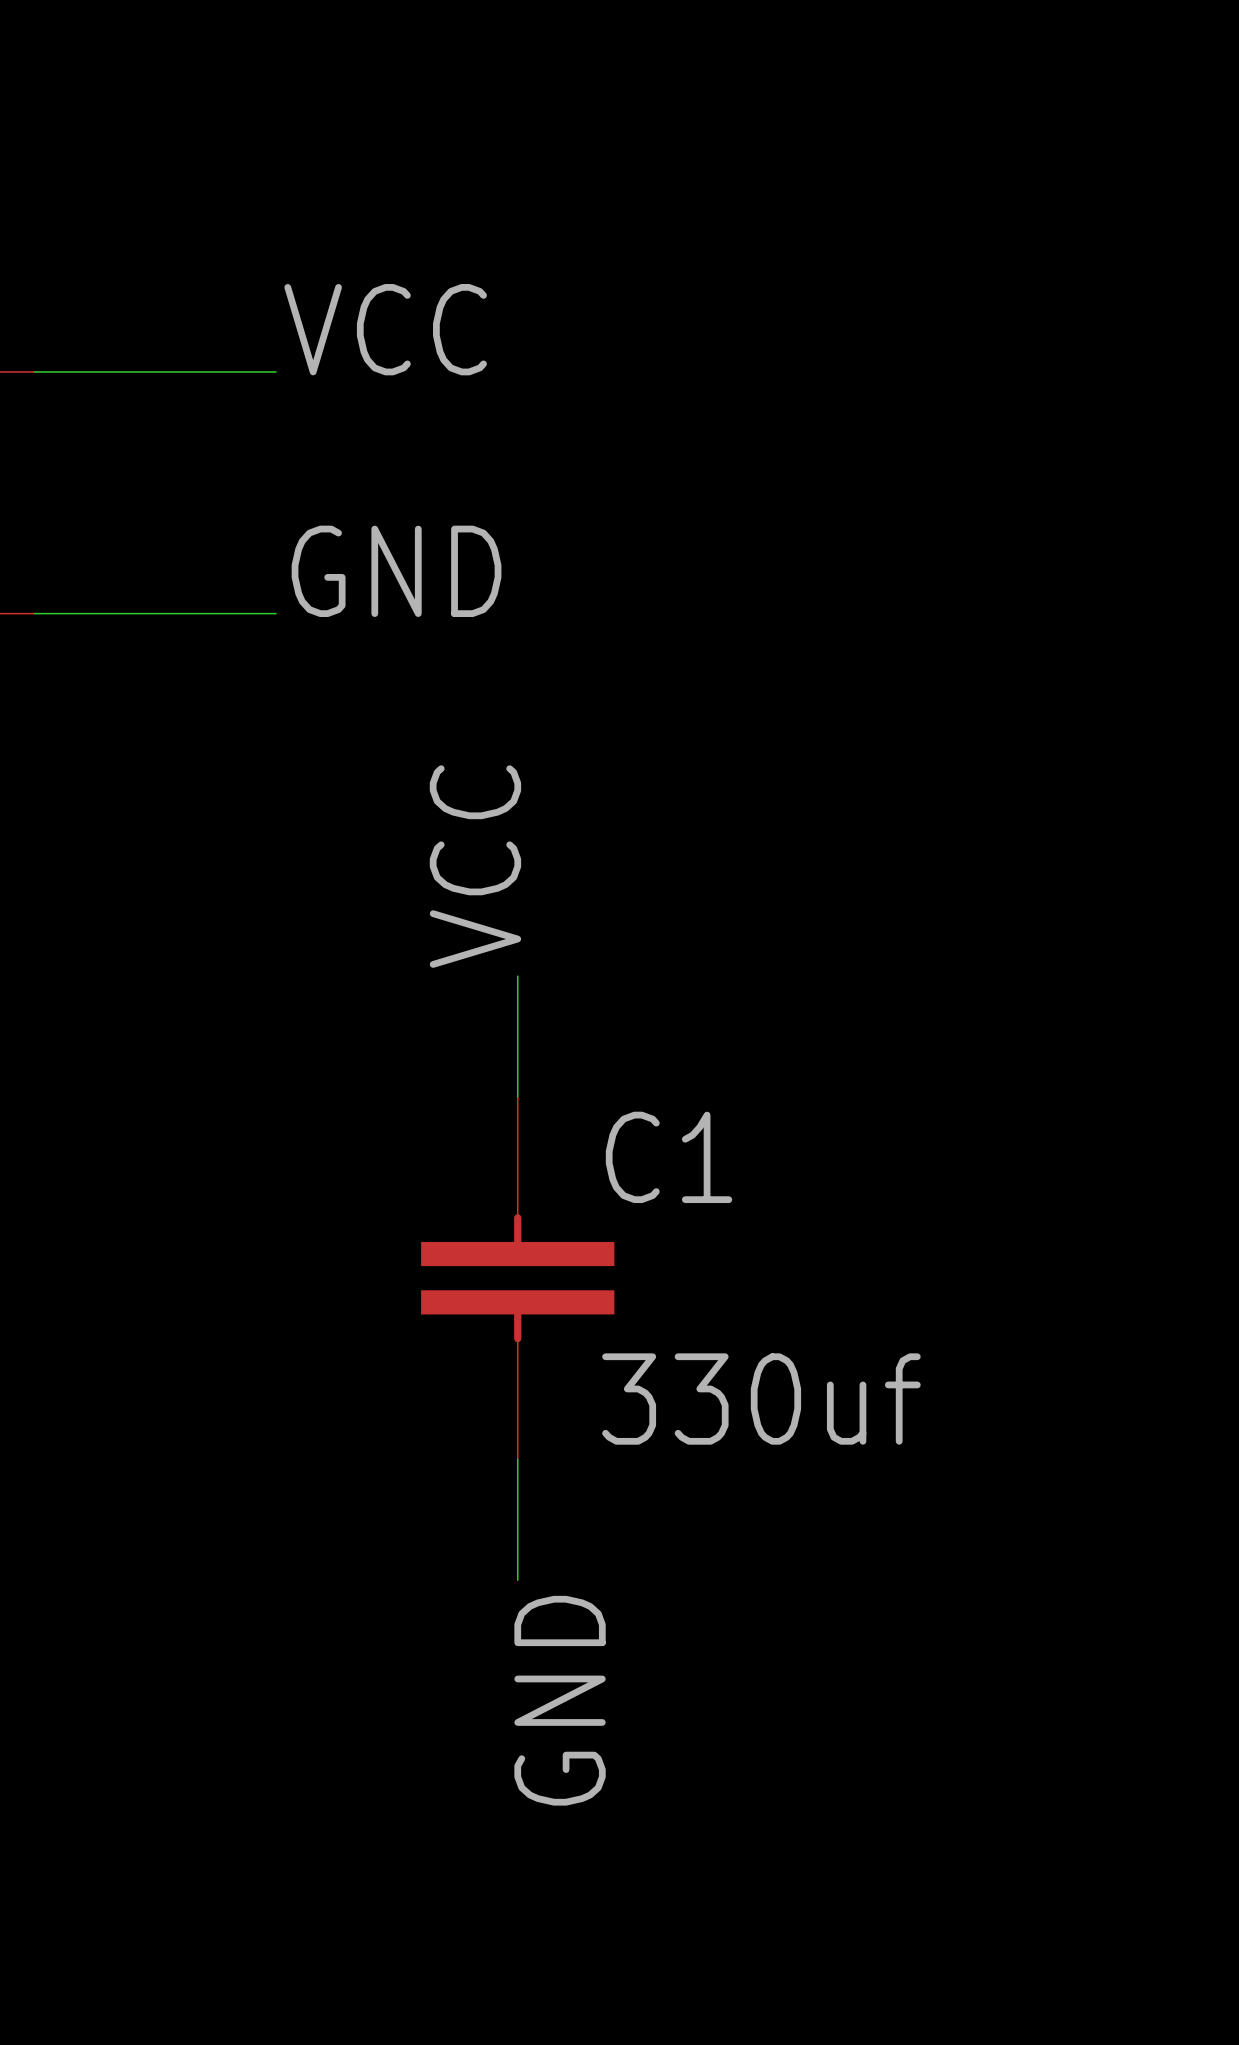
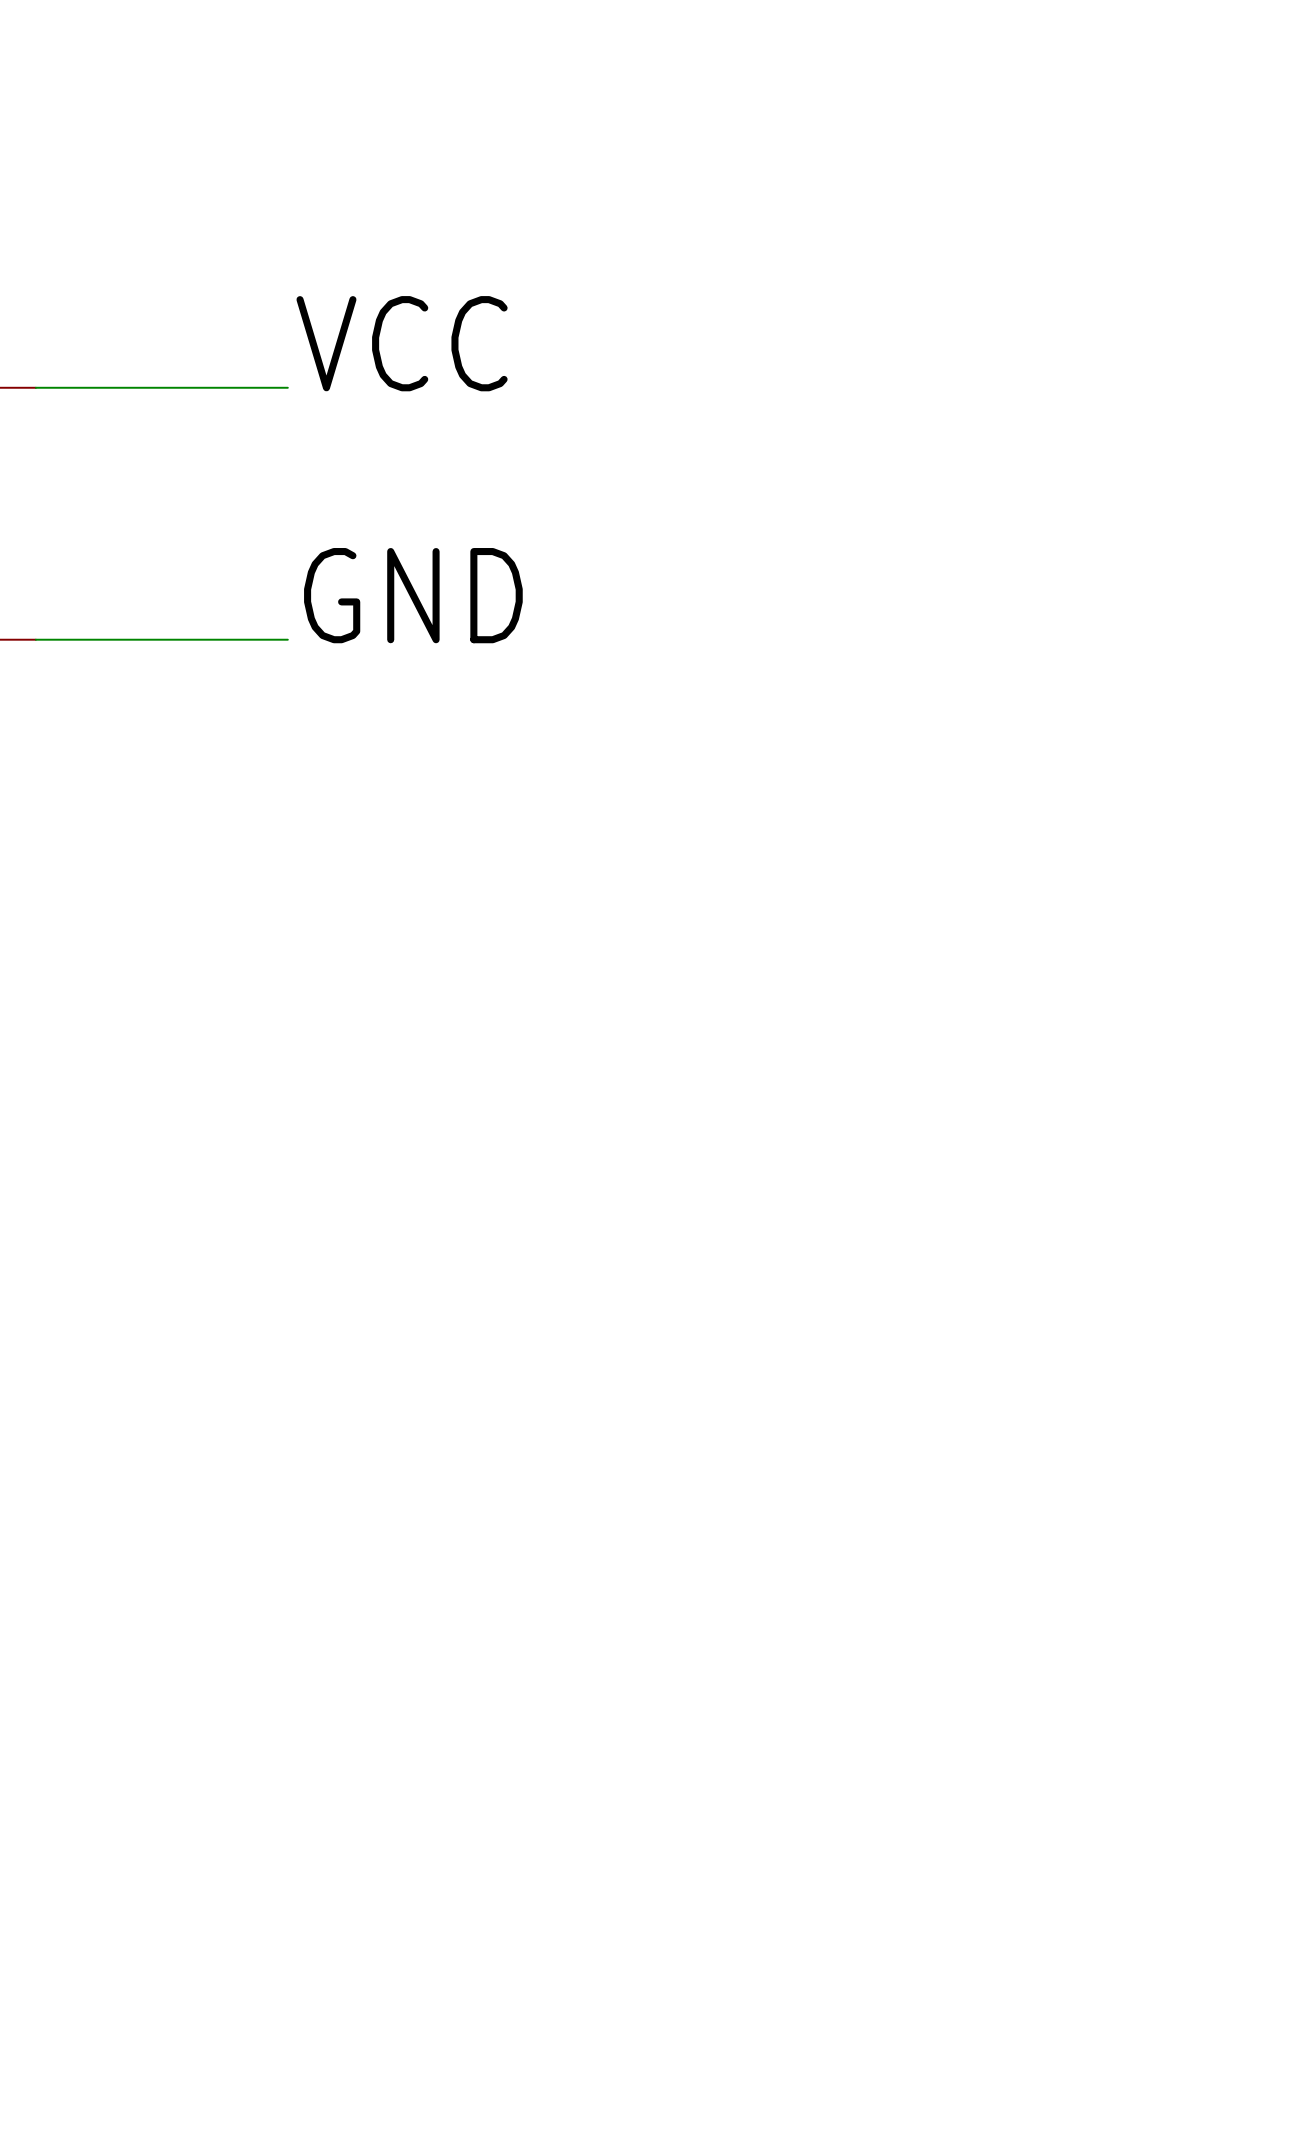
label: VCC (475, 866) -> none
wire: (517, 976) (517, 1096) -> none
C1: 330uf (517, 1278) -> none
wire: (517, 1459) (517, 1580) -> none
label: GND (560, 1700) -> none

